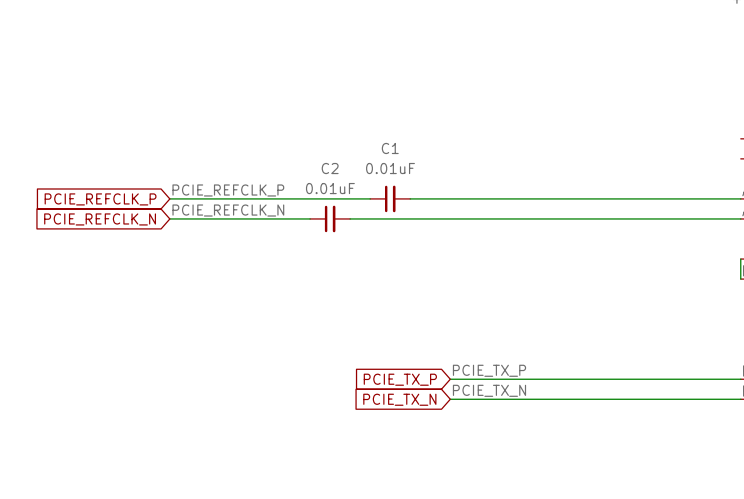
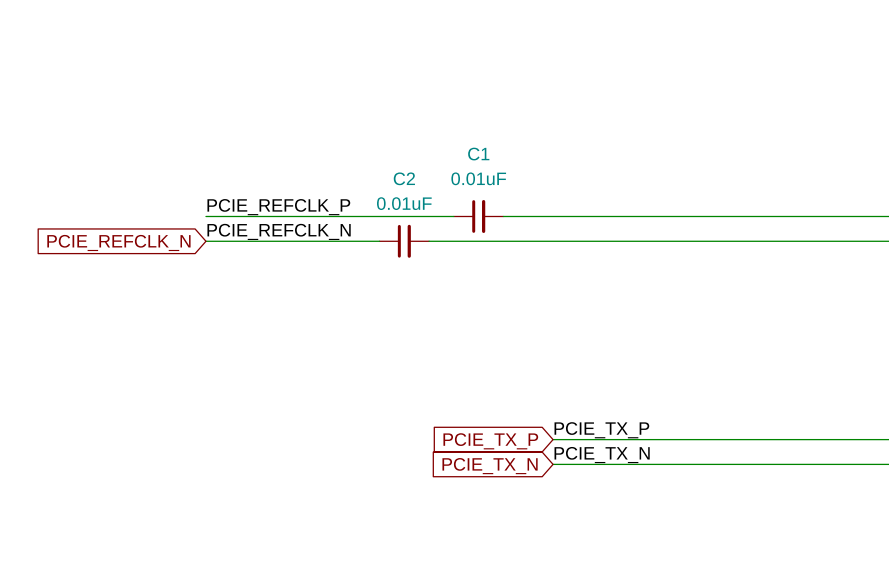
global label: PCIE_REFCLK_P (100, 199) -> none

